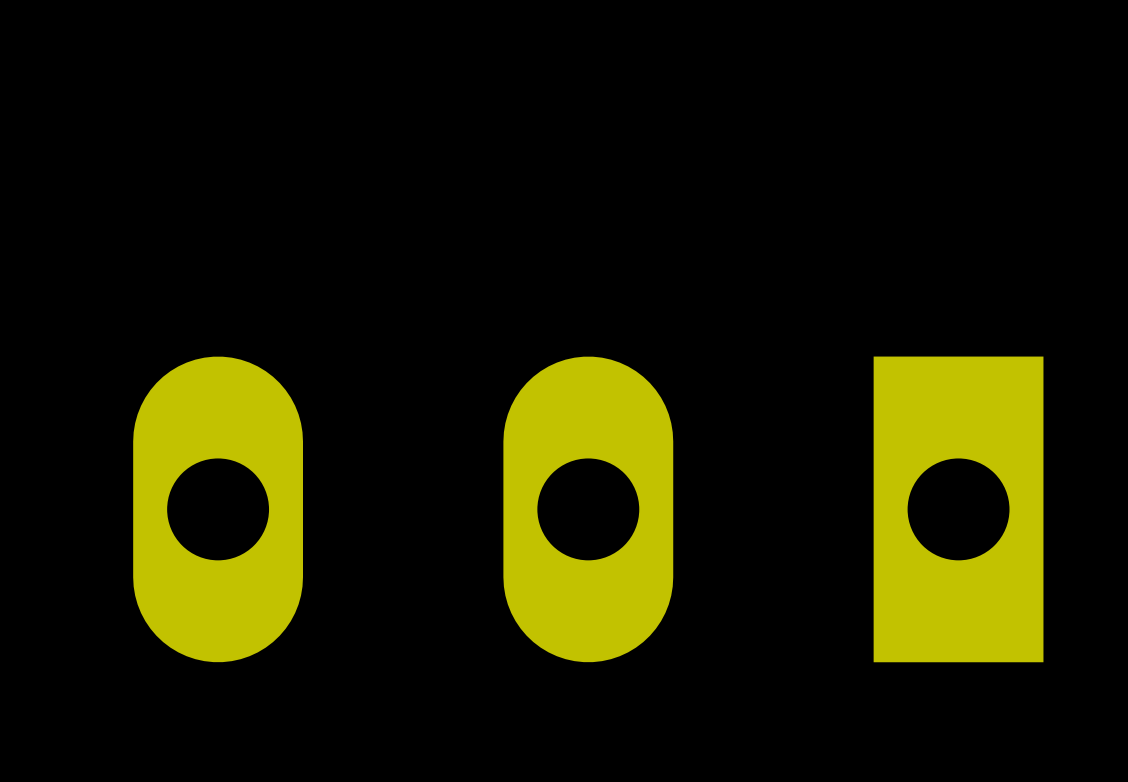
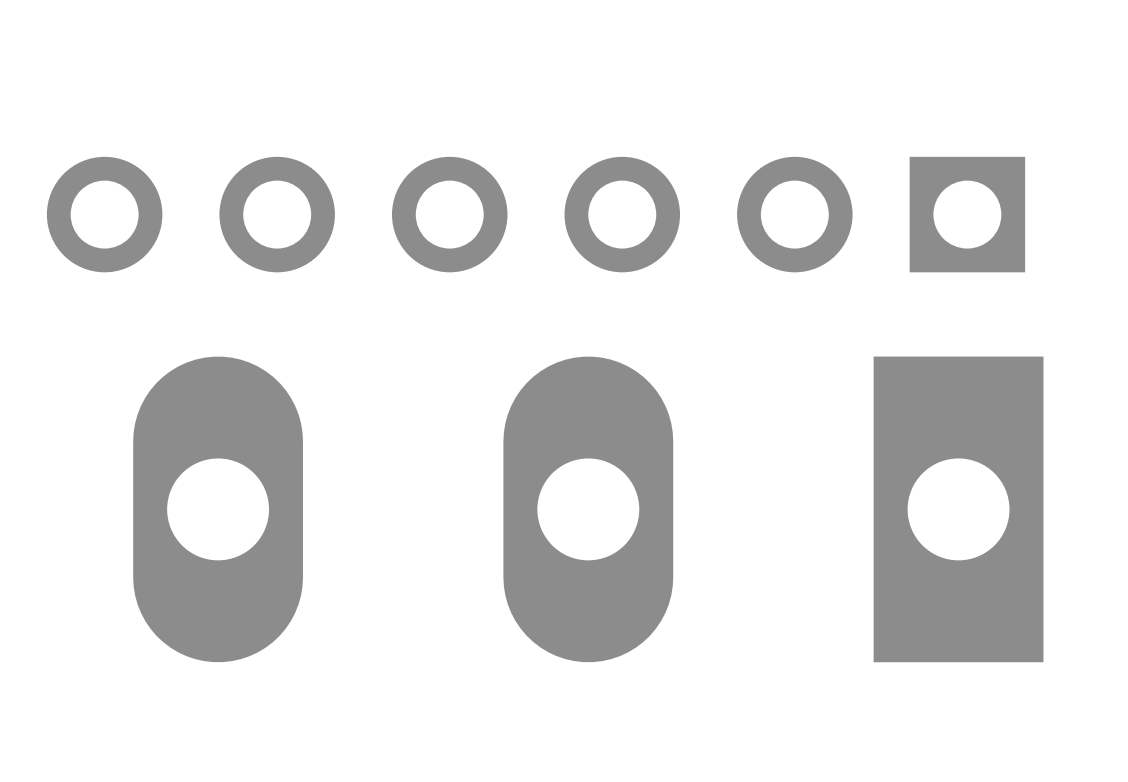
part: none -> (536, 214)

